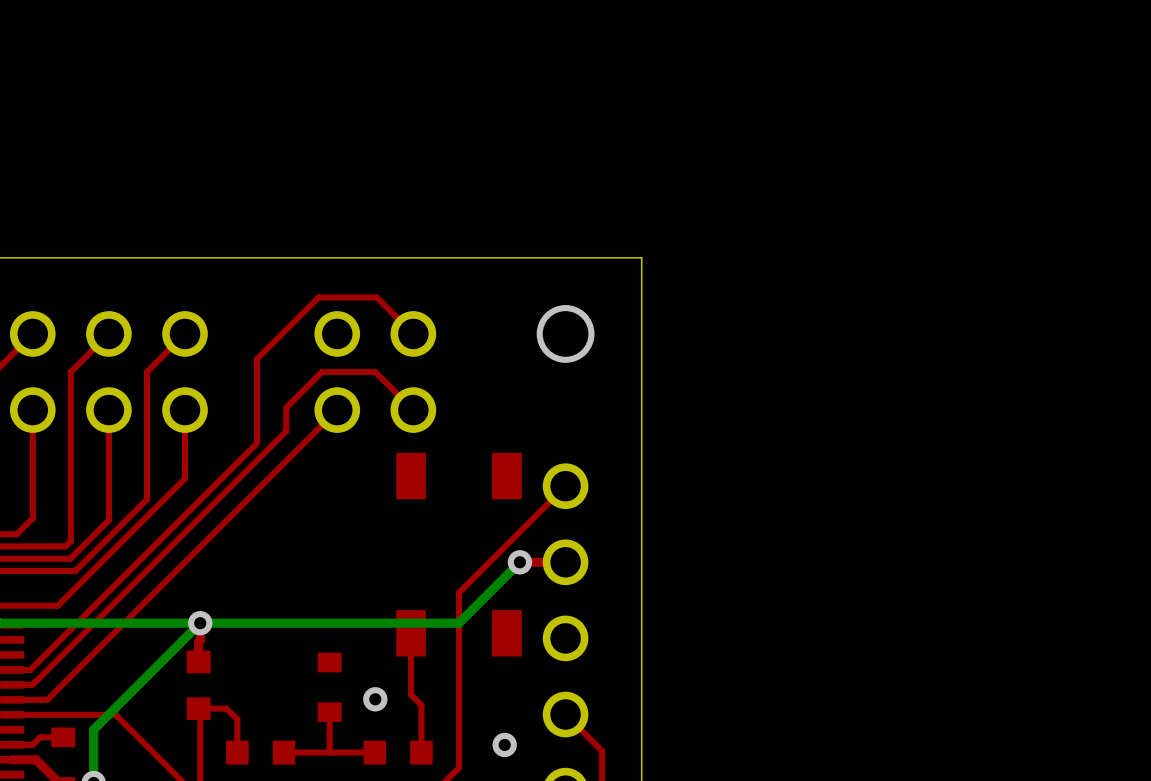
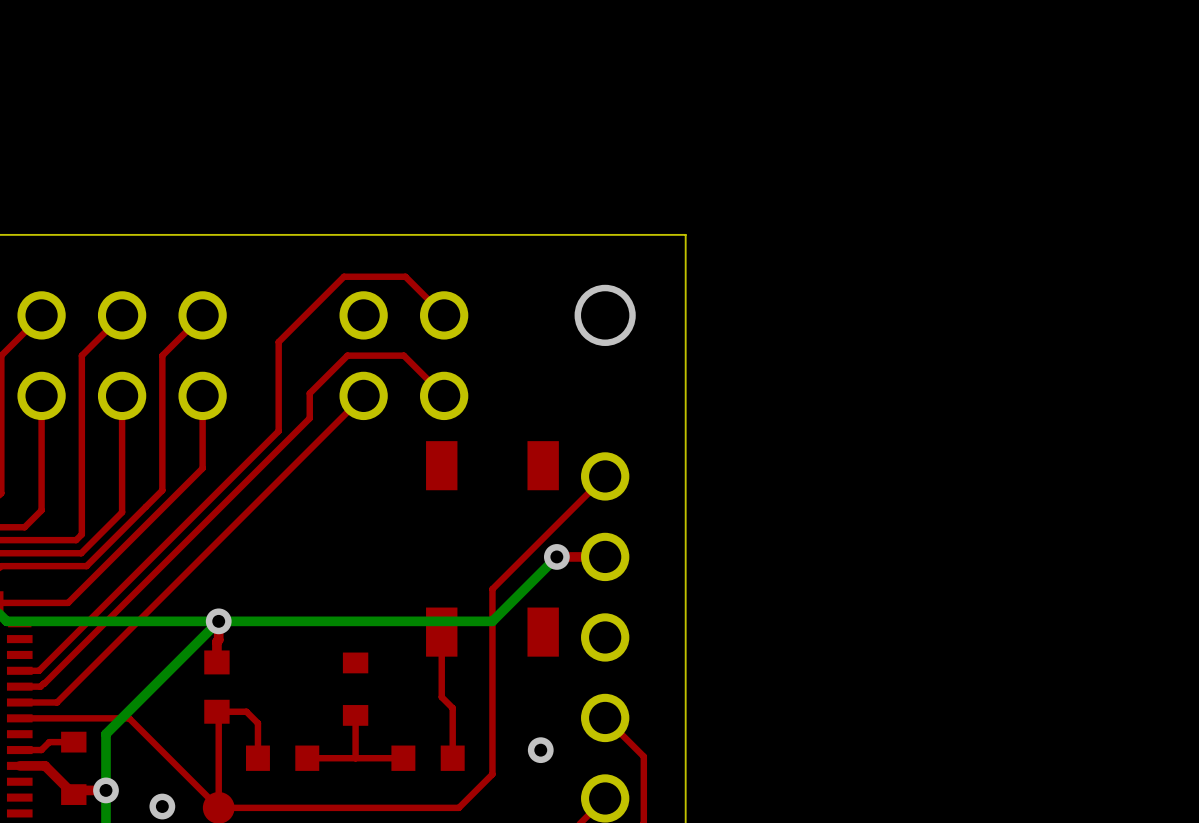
via: (375, 699) -> none

